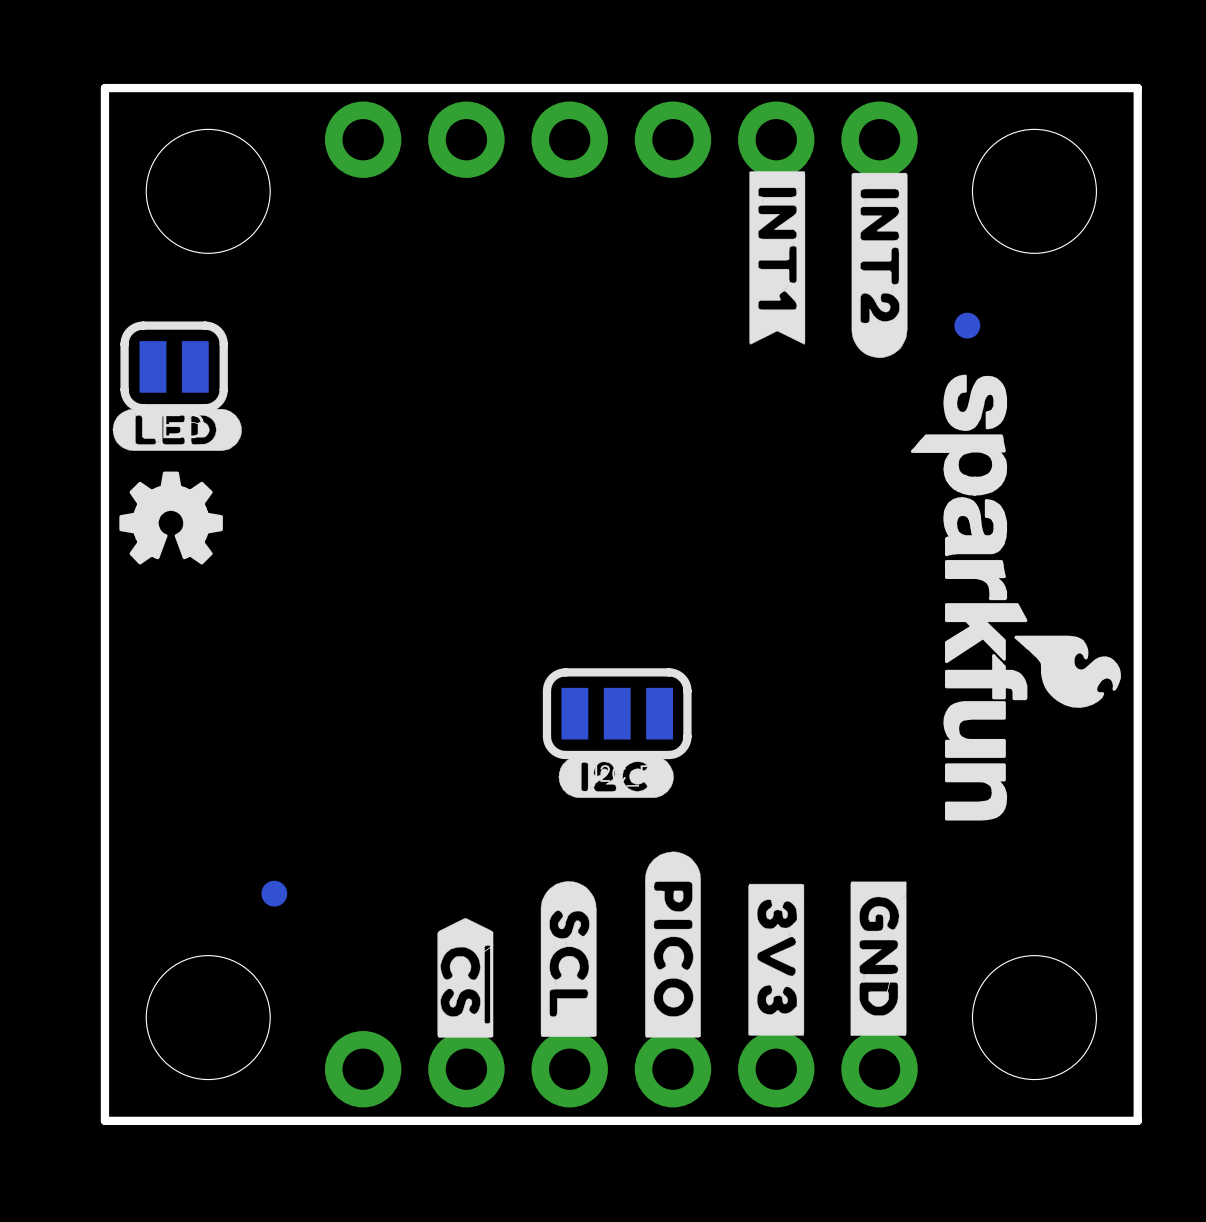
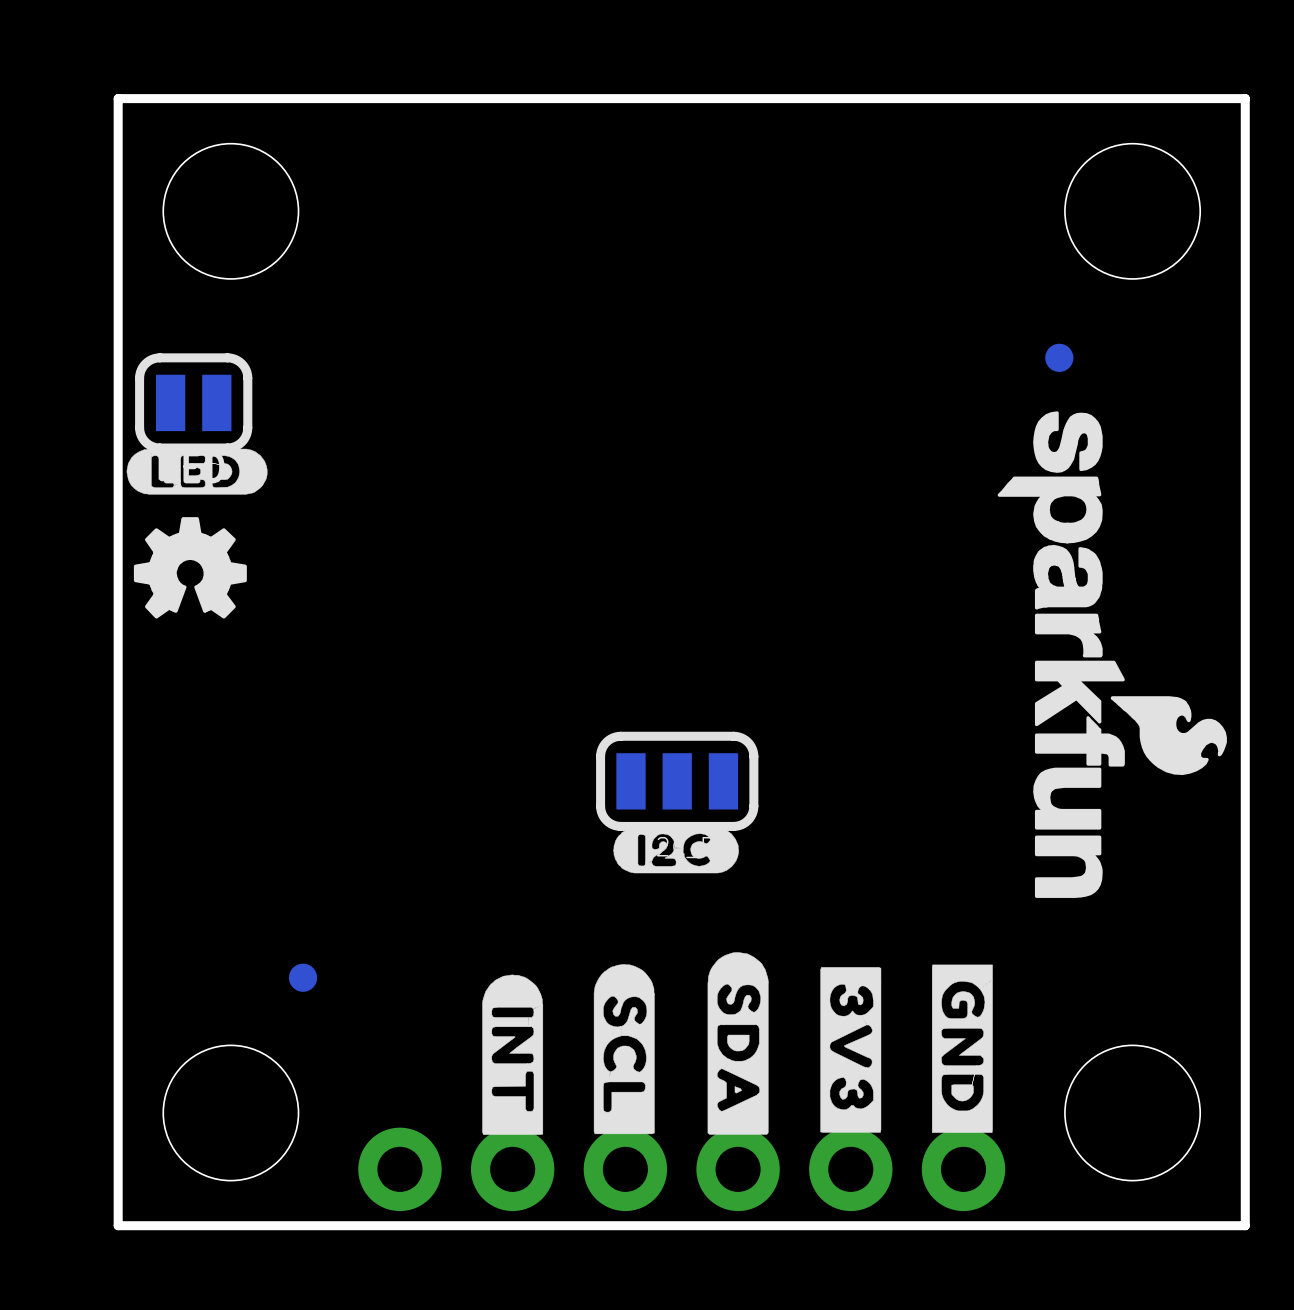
part: (621, 139) -> none
drawing: [749, 171, 908, 358] -> none
drawing shape: [645, 851, 701, 1038] -> [707, 952, 769, 1135]
drawing shape: [437, 918, 494, 1038] -> [482, 974, 544, 1135]

